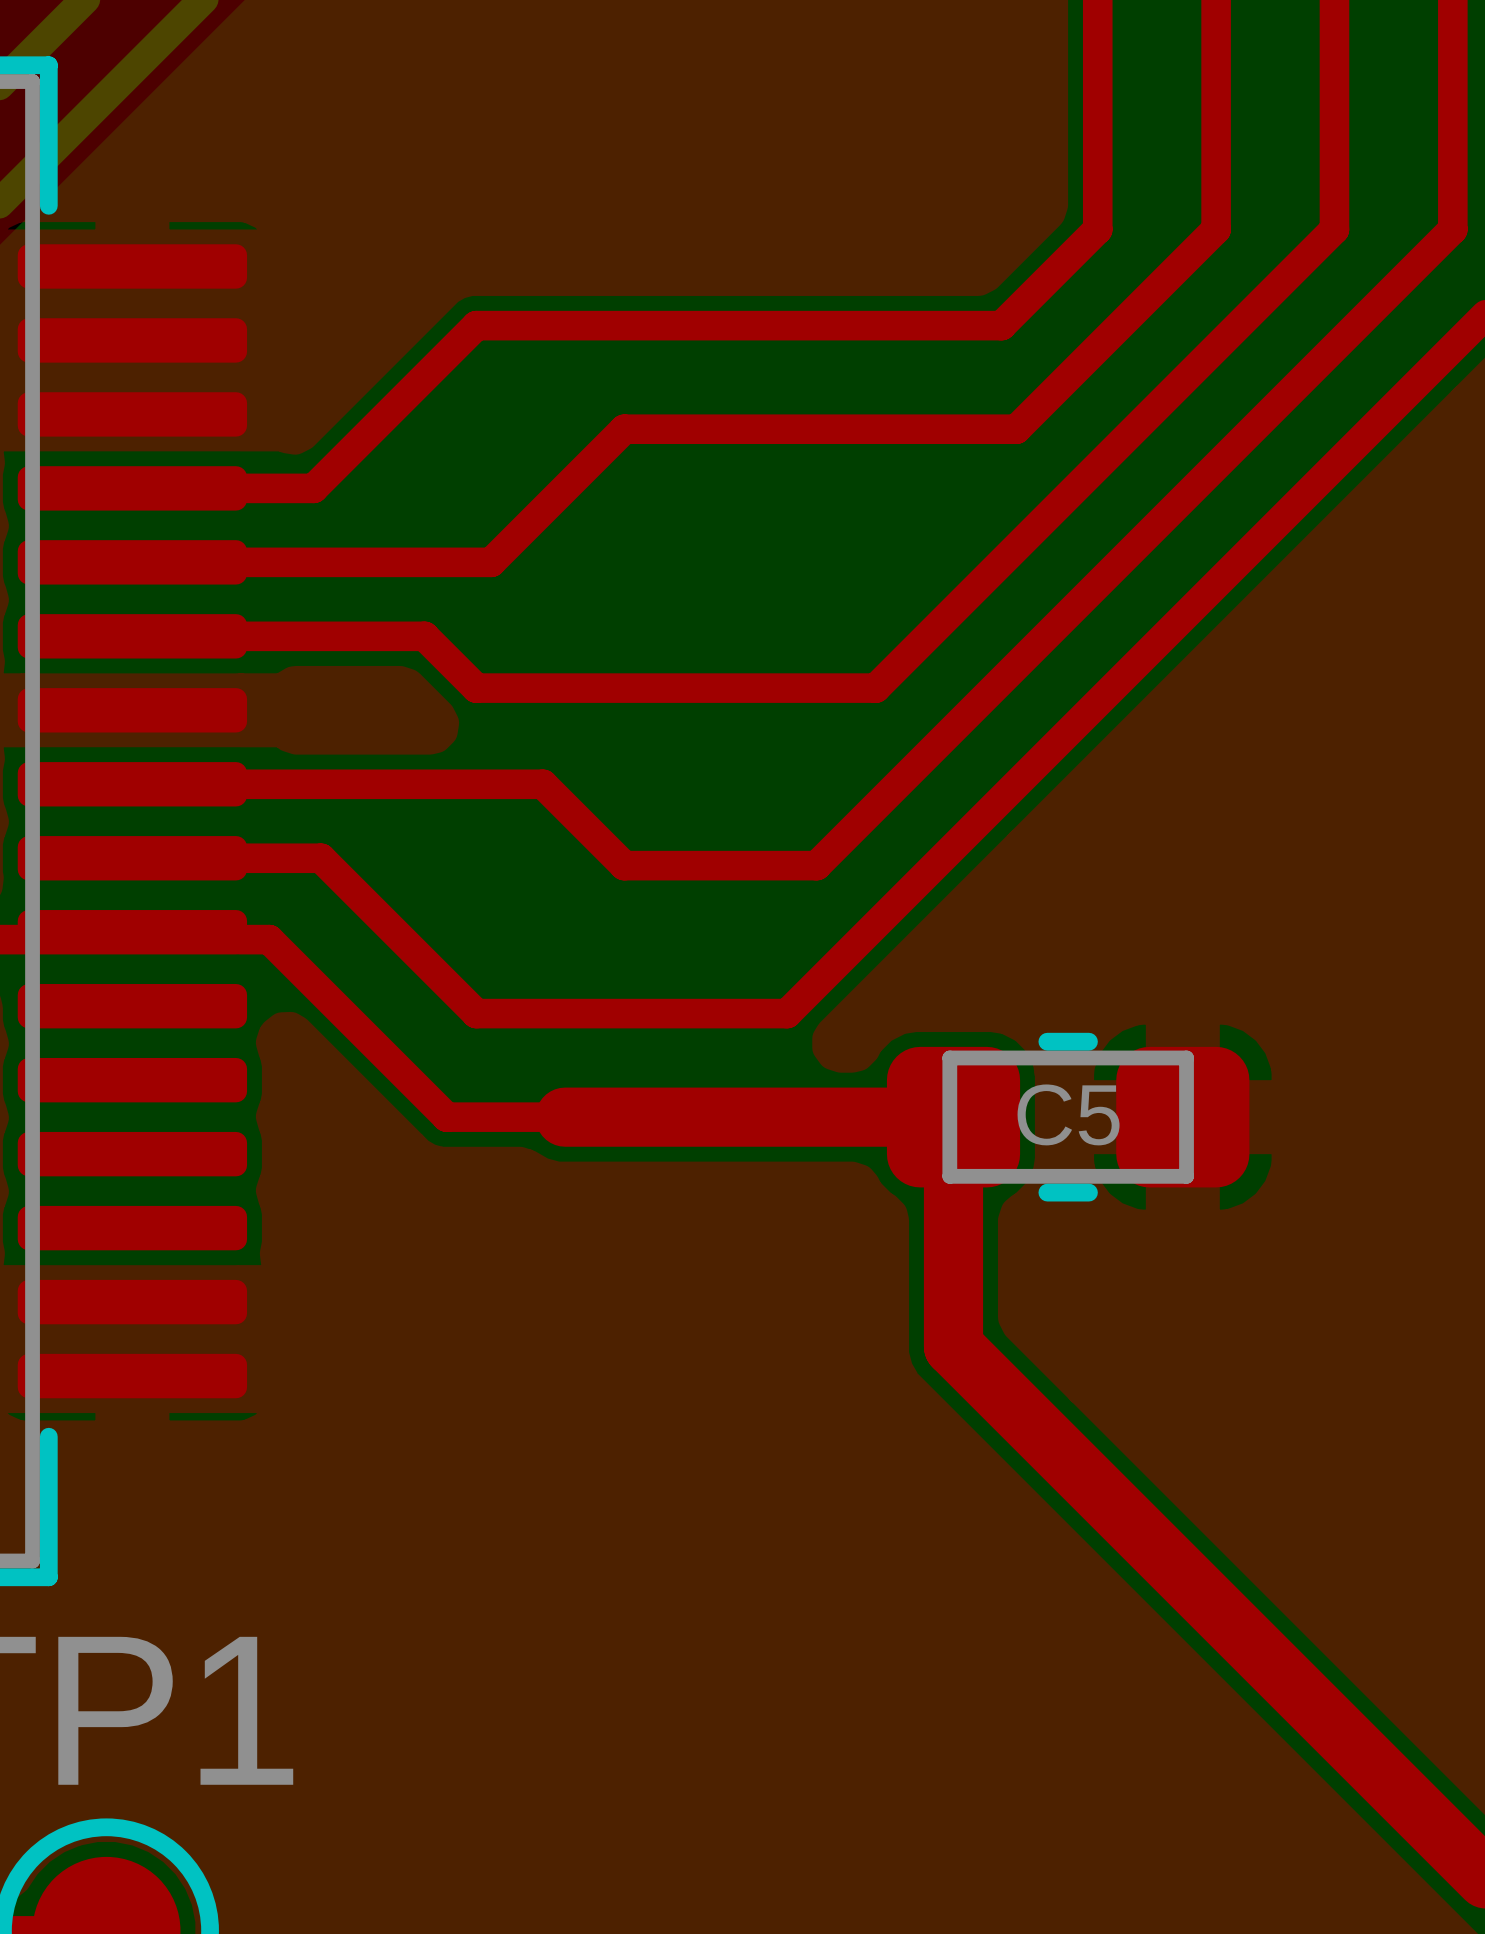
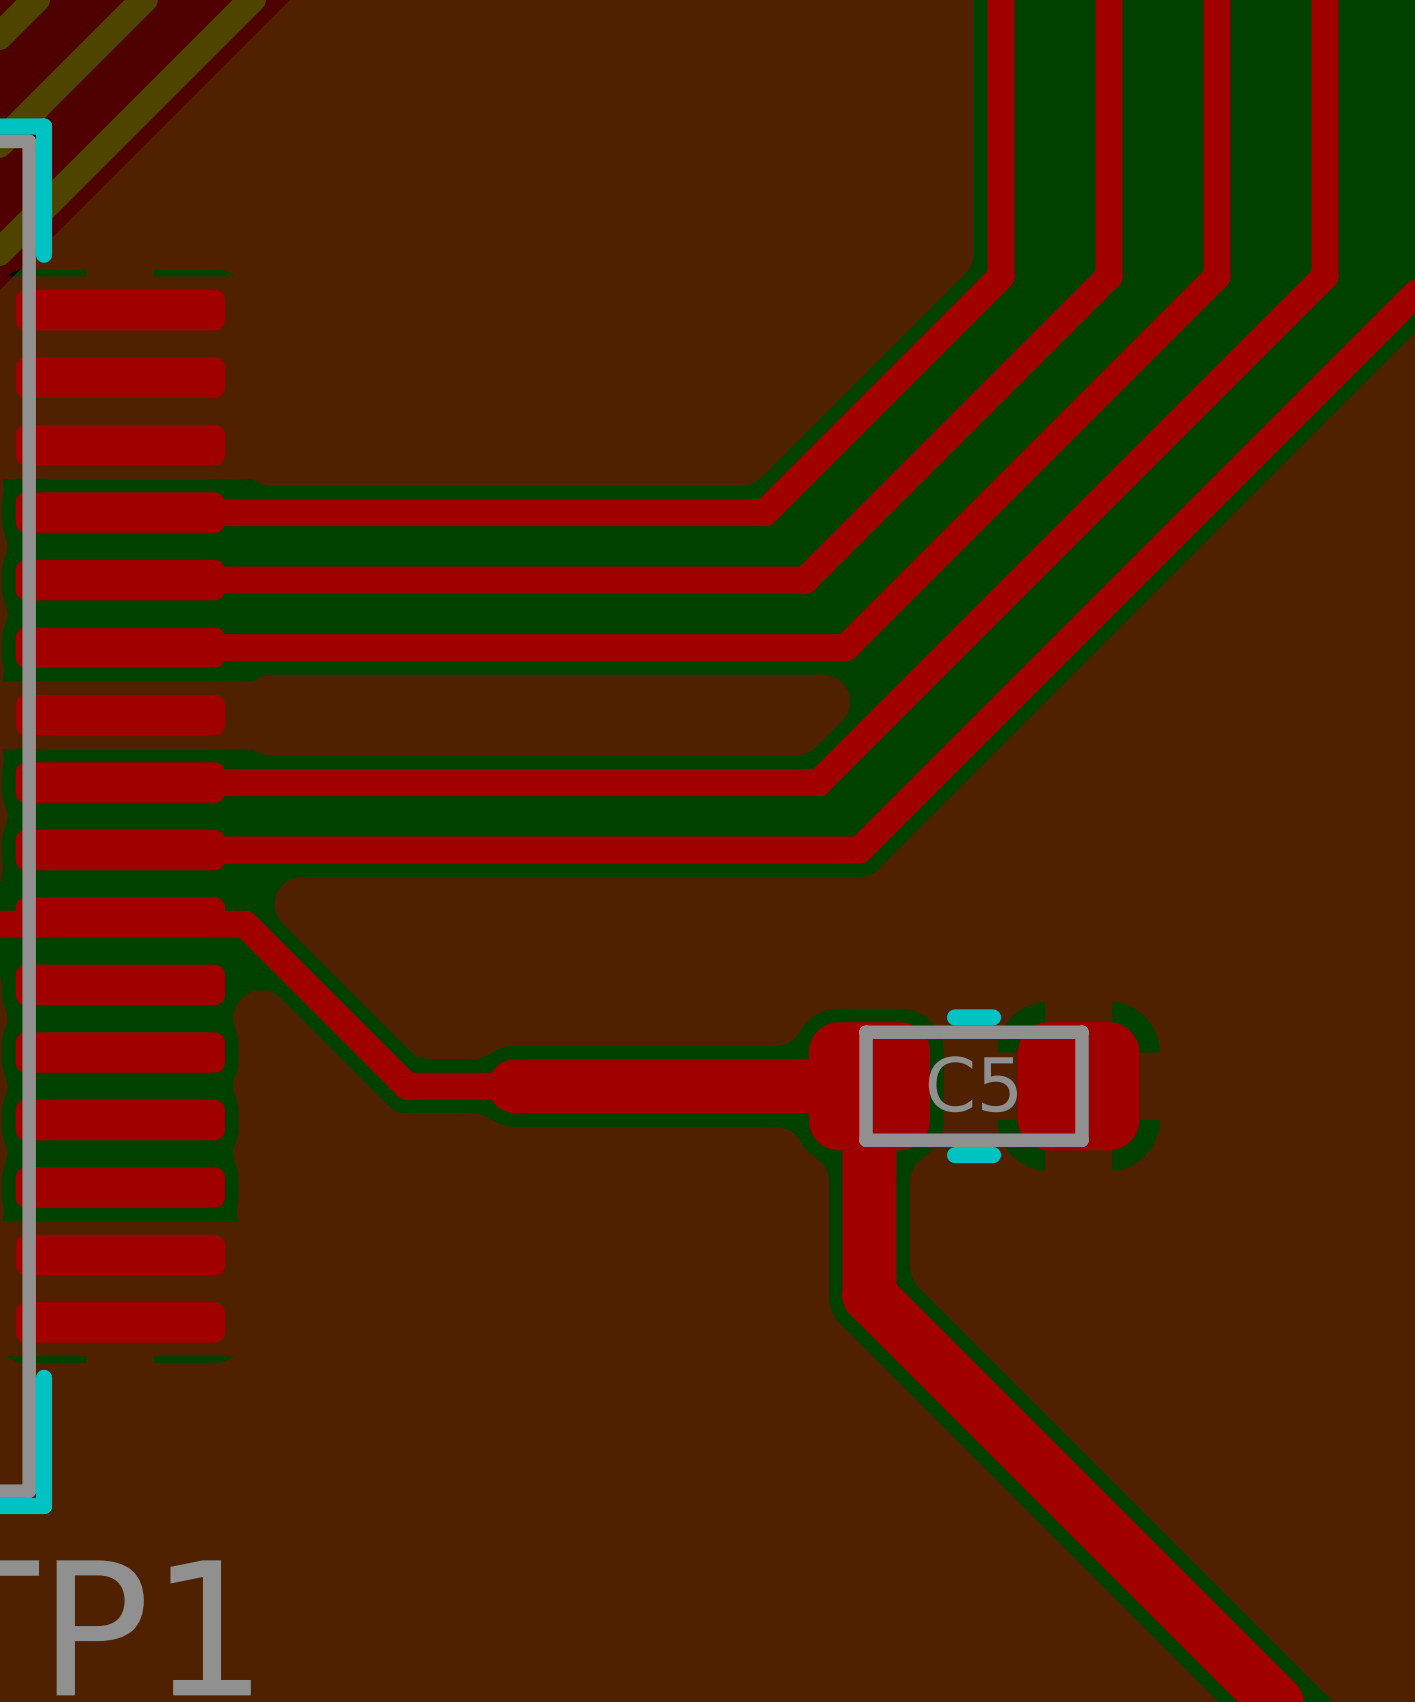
top track: (1001, 325) (476, 325) (313, 488) -> (913, 364) (764, 512) (285, 512)
top track: (1016, 429) (624, 429) (491, 562) -> (926, 458) (805, 580) (447, 580)
top track: (424, 636) (476, 688) (875, 688) (927, 636) -> (386, 647) (845, 647)
top track: (542, 784) (624, 865) (816, 865) (898, 784) -> (494, 782) (818, 782)
top track: (321, 858) (476, 1013) (787, 1013) (942, 858) -> (292, 850) (859, 850)

